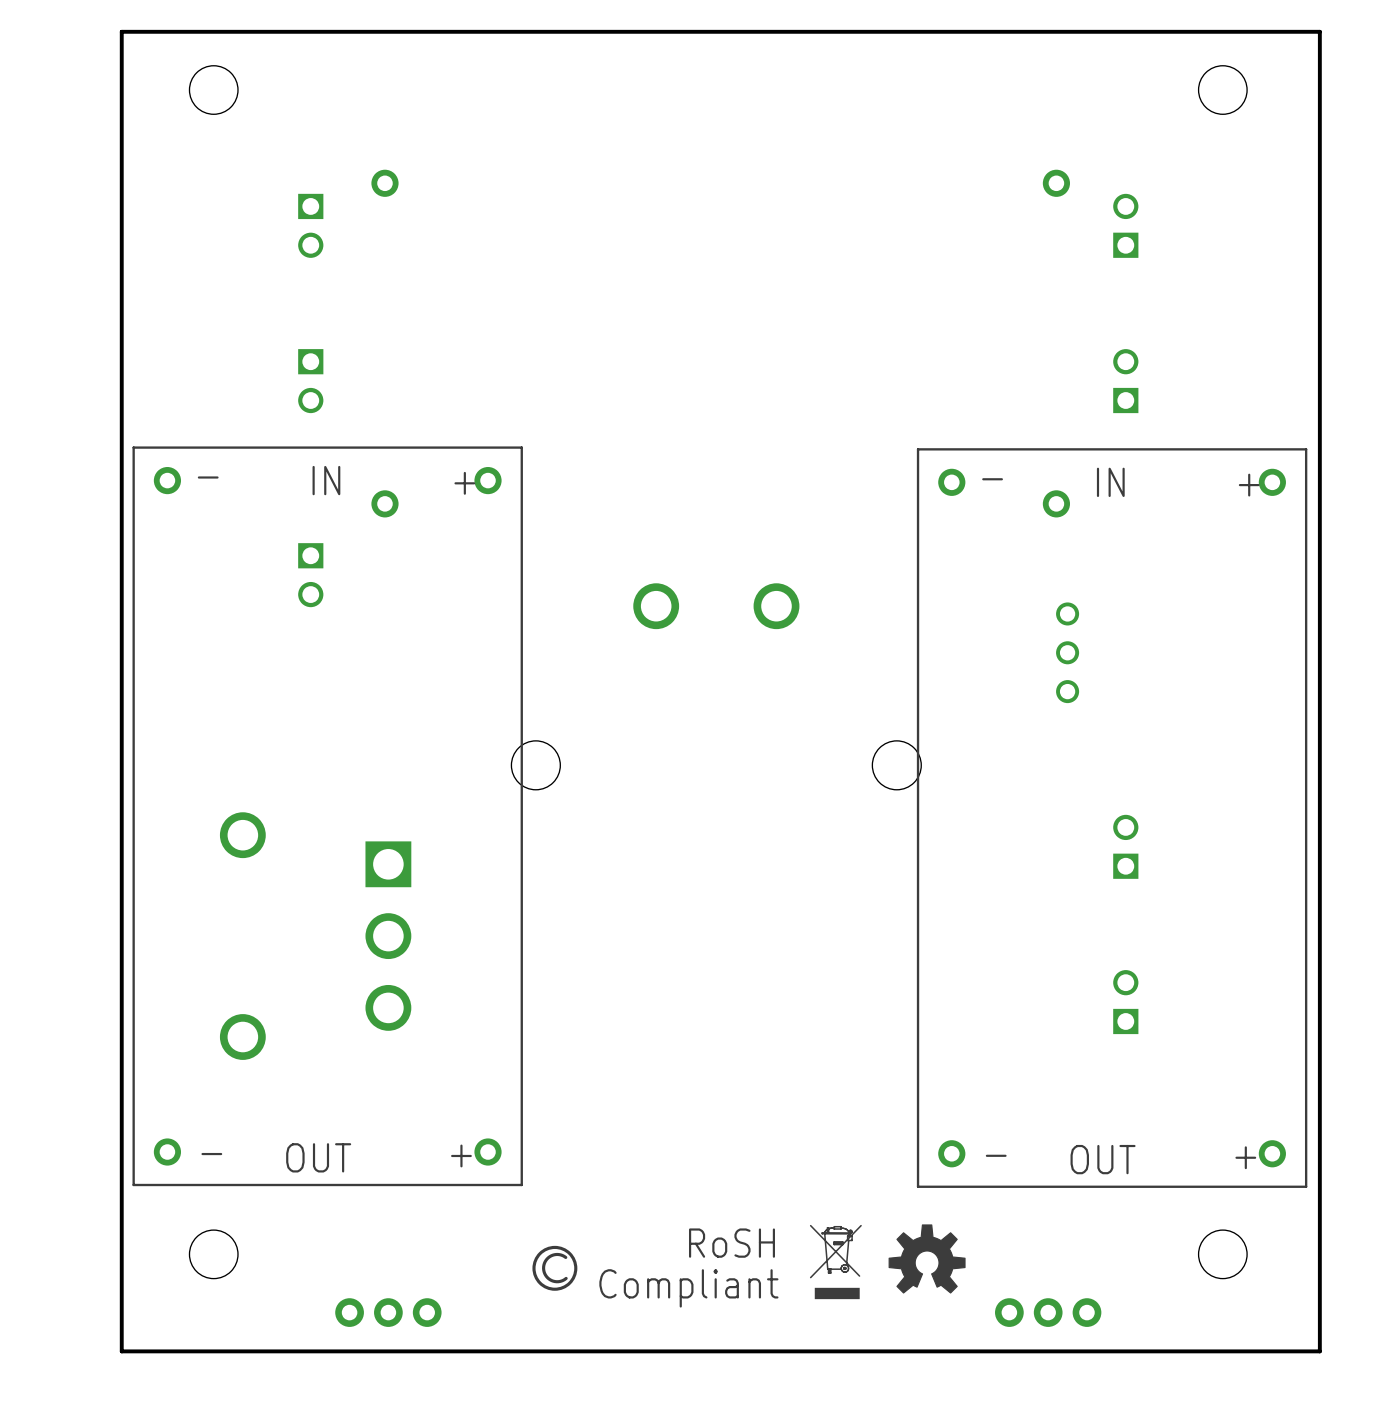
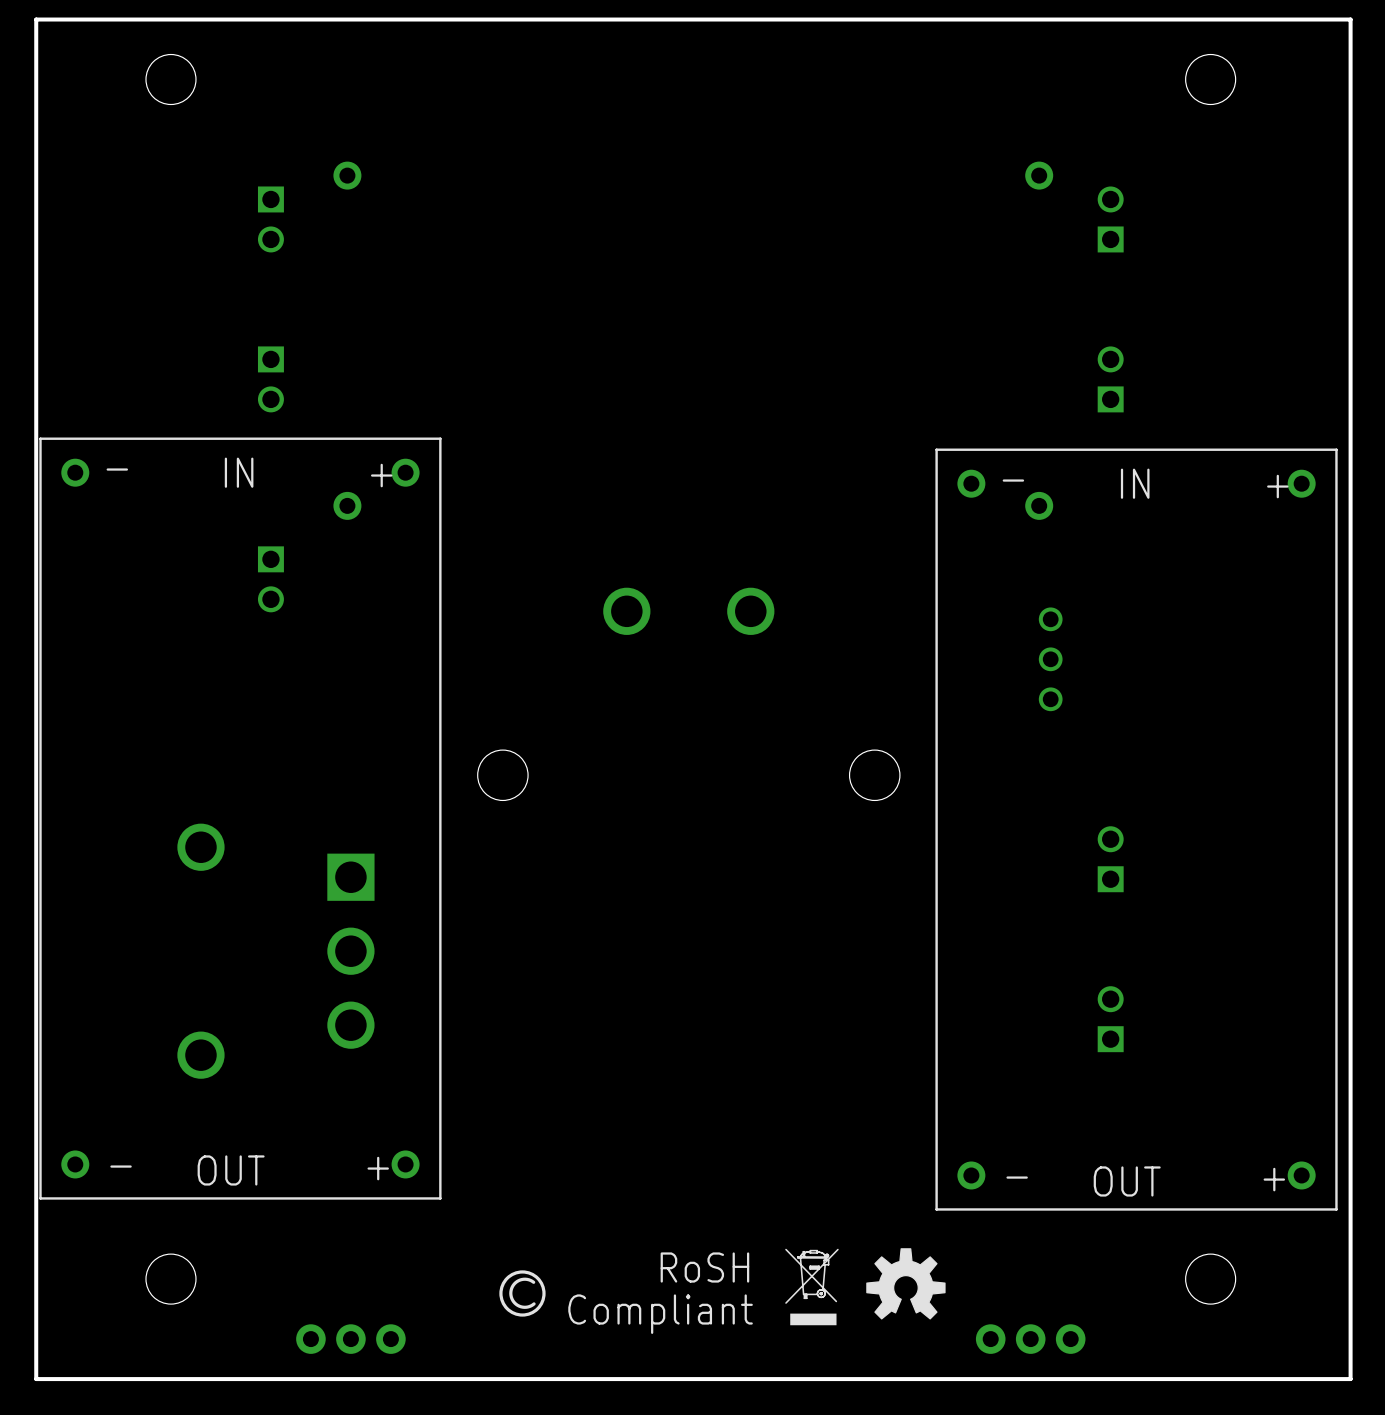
board edge: (121, 31) (121, 1351) -> (76, 19) (36, 19) (36, 1379) (76, 1379)
board edge: (1319, 31) (1319, 1351) -> (1310, 19) (1350, 19) (1350, 1379) (1310, 1379)
part position: (327, 816) -> (240, 818)
part position: (1112, 818) -> (1136, 829)

